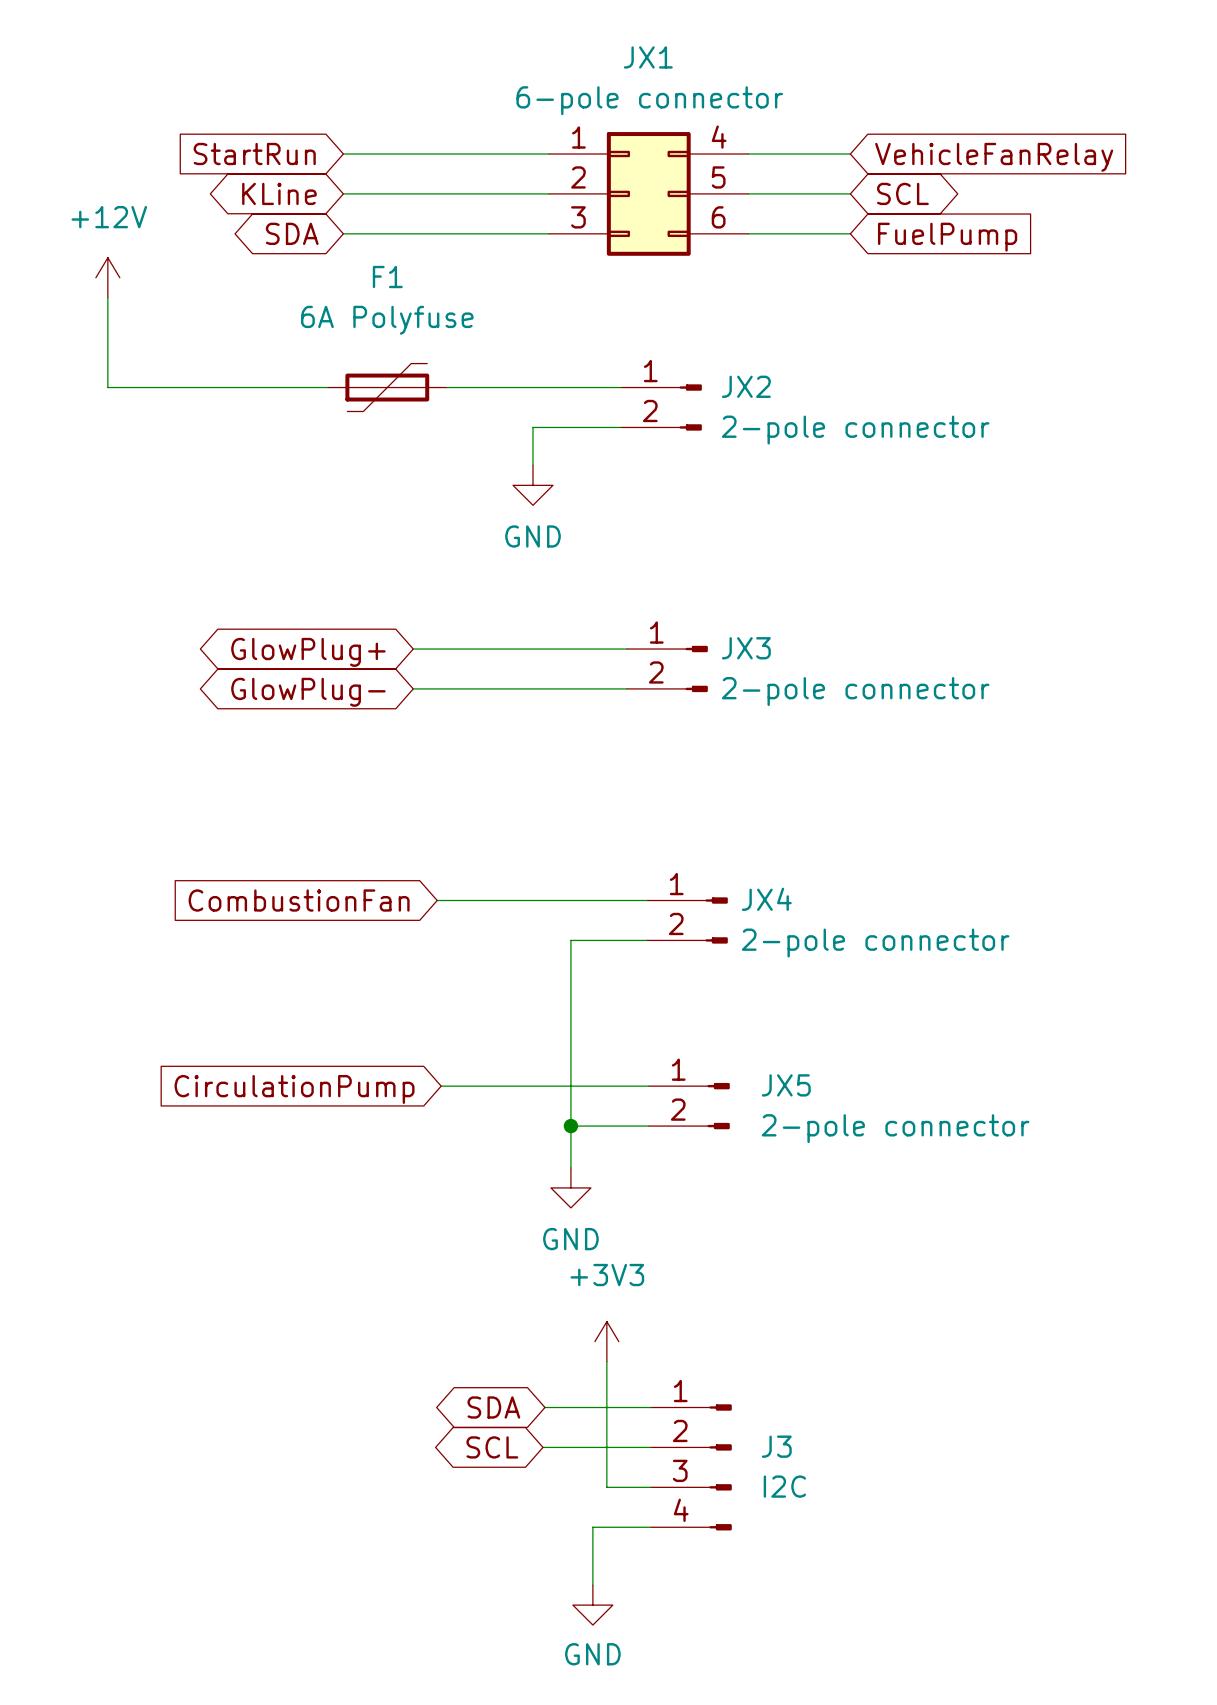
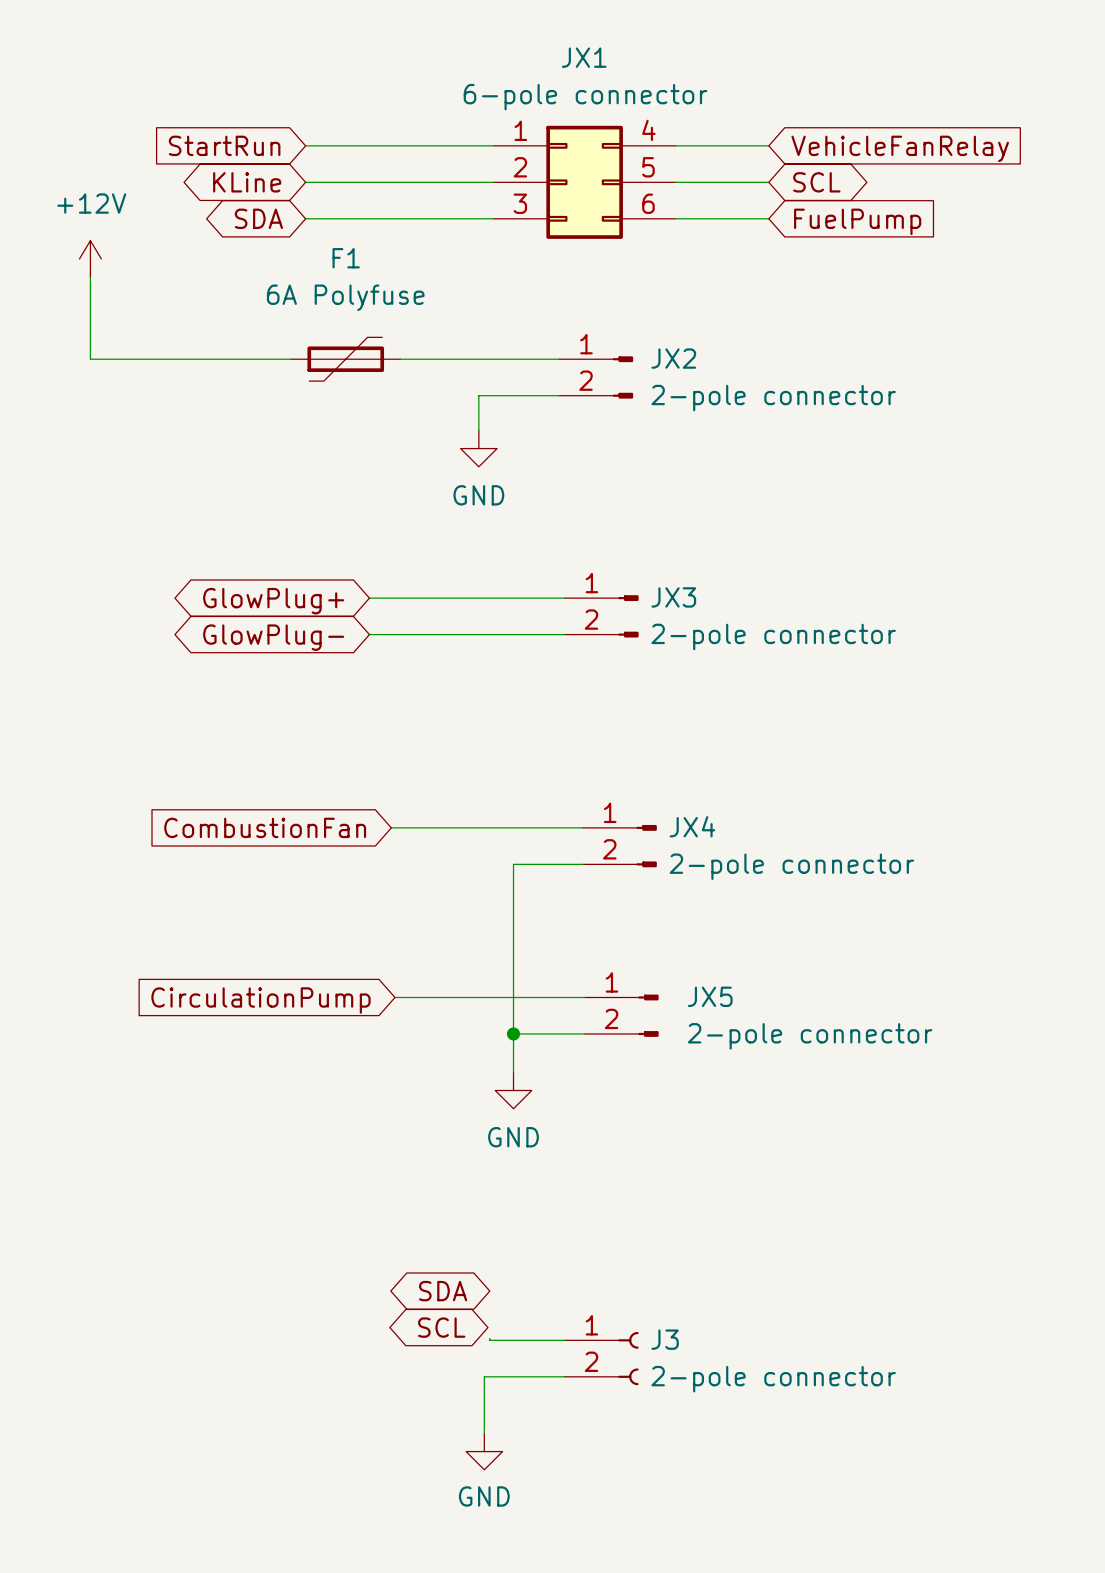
power symbol: +3V3 (606, 1341) -> none
wire: (606, 1361) (606, 1487) (650, 1487) -> none
J3 symbol: [650, 1404, 732, 1531] -> [564, 1331, 639, 1386]
wire: (544, 1407) (650, 1407) -> none
wire: (542, 1447) (650, 1447) -> none
wire: none -> (489, 1338) (489, 1340) (564, 1340)
J3 value: I2C (784, 1486) -> 2-pole connector (773, 1379)
wire: none -> (564, 1376) (484, 1376) (484, 1433)
wire: (650, 1527) (592, 1527) (592, 1585) -> none
power symbol position: GND (592, 1605) -> GND (484, 1451)

